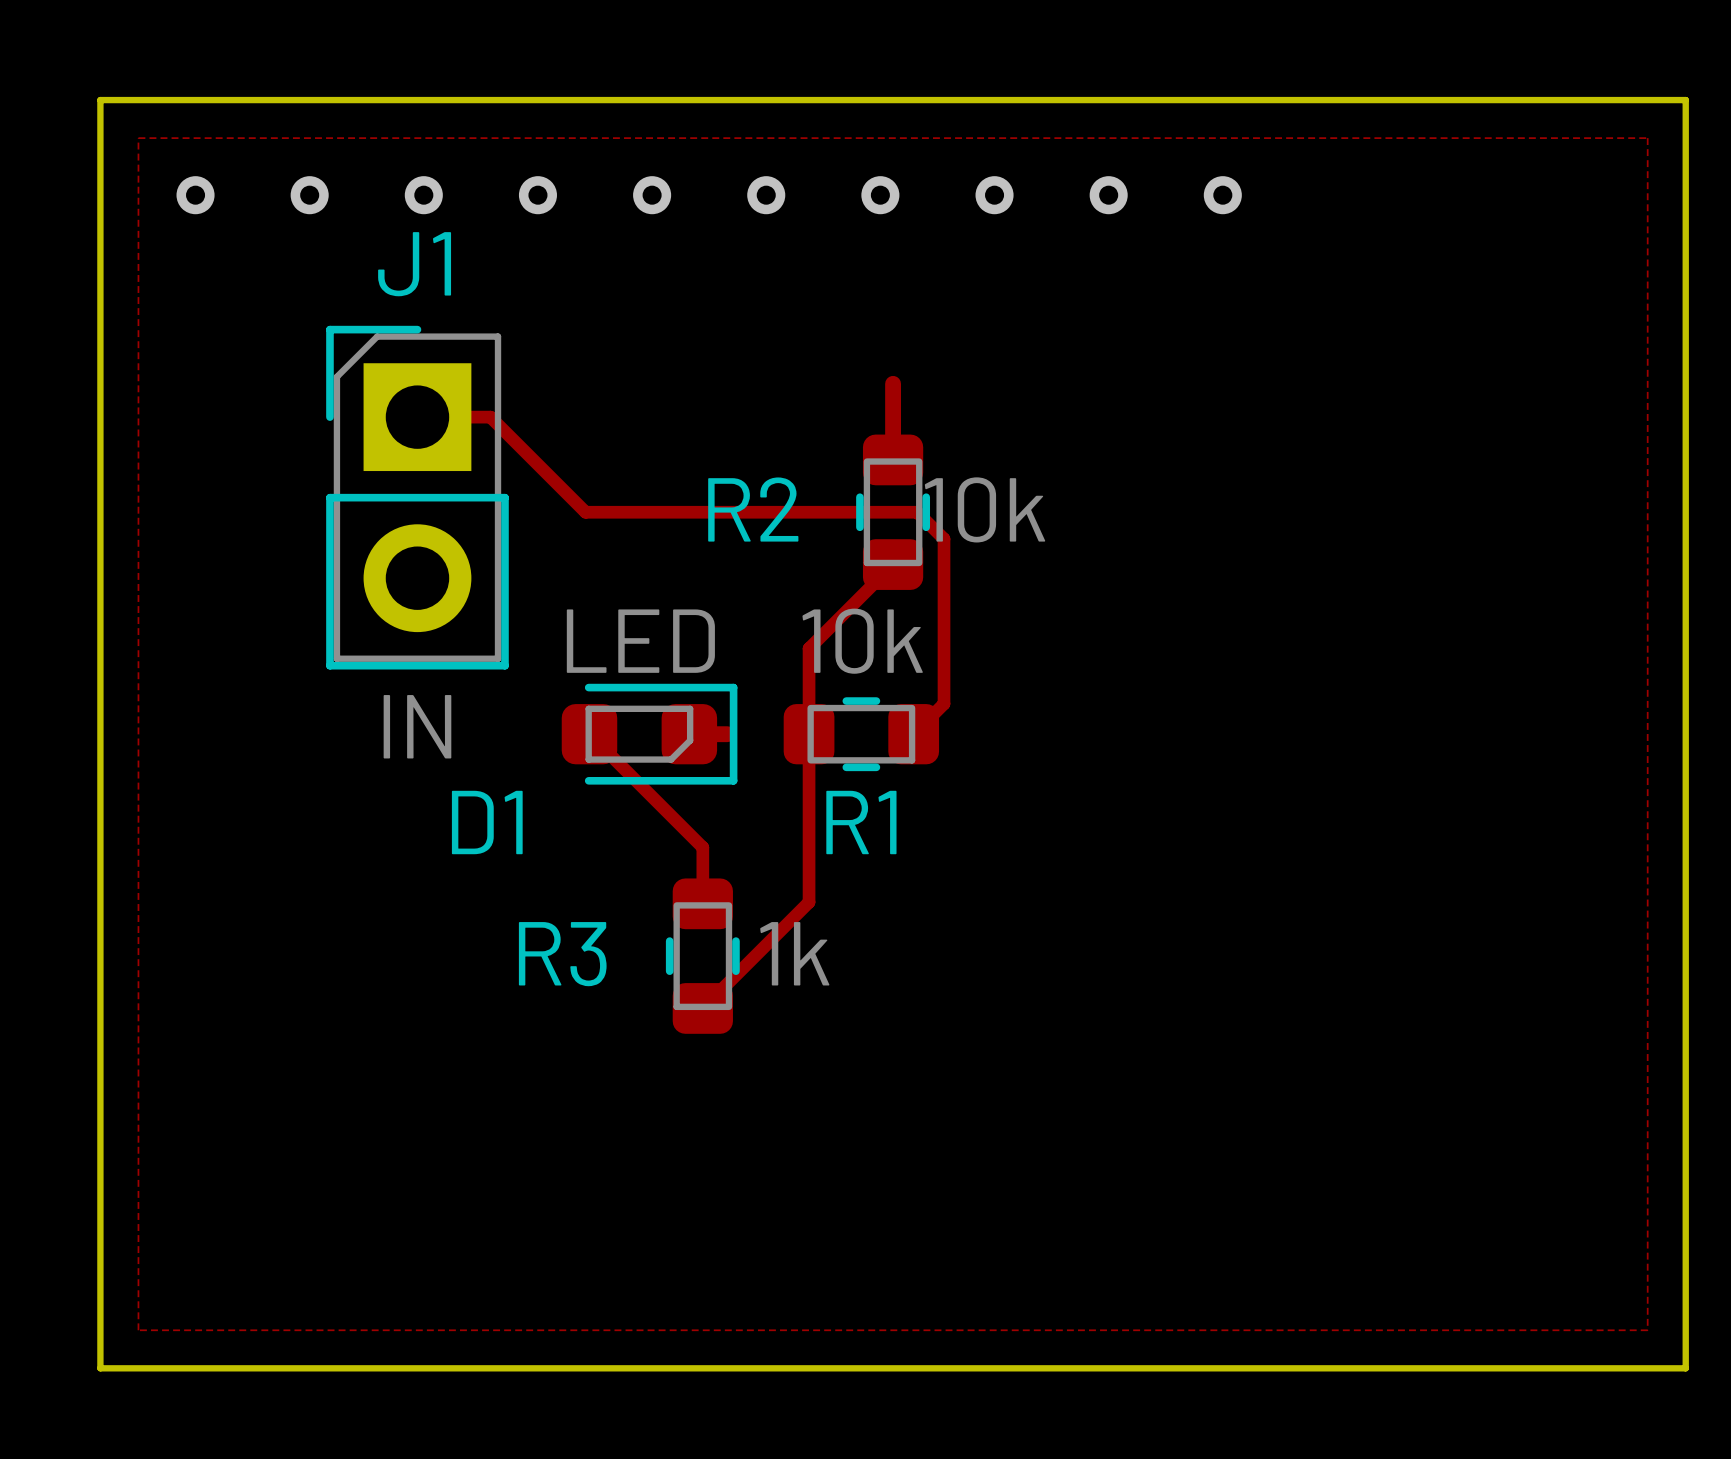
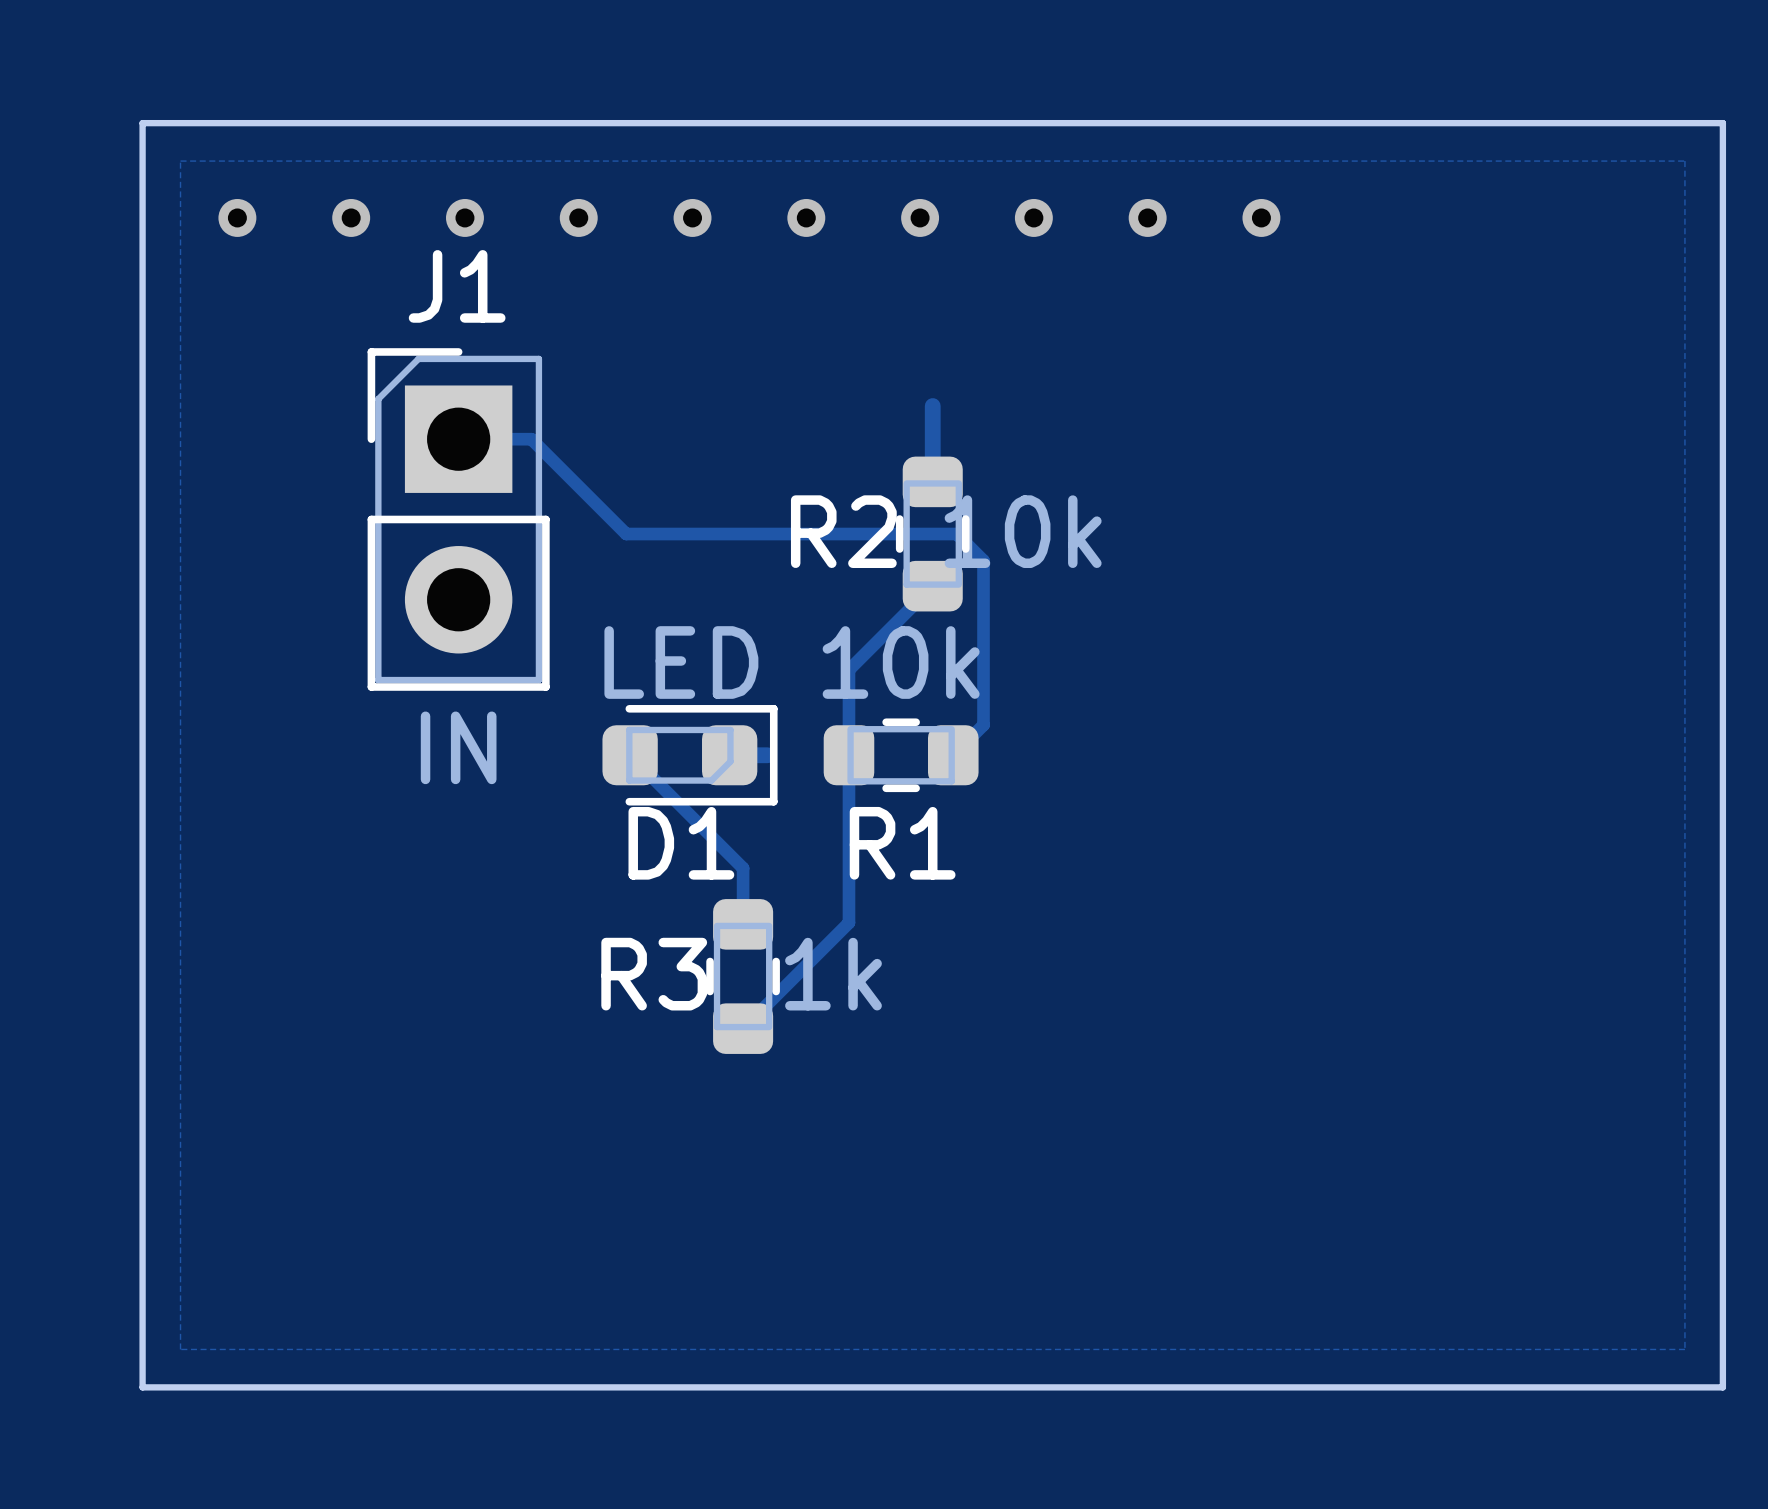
R2 name position: R2 (753, 509) -> R2 (843, 531)
D1 name position: D1 (487, 822) -> D1 (681, 843)
R3 name position: R3 (562, 954) -> R3 (654, 974)

